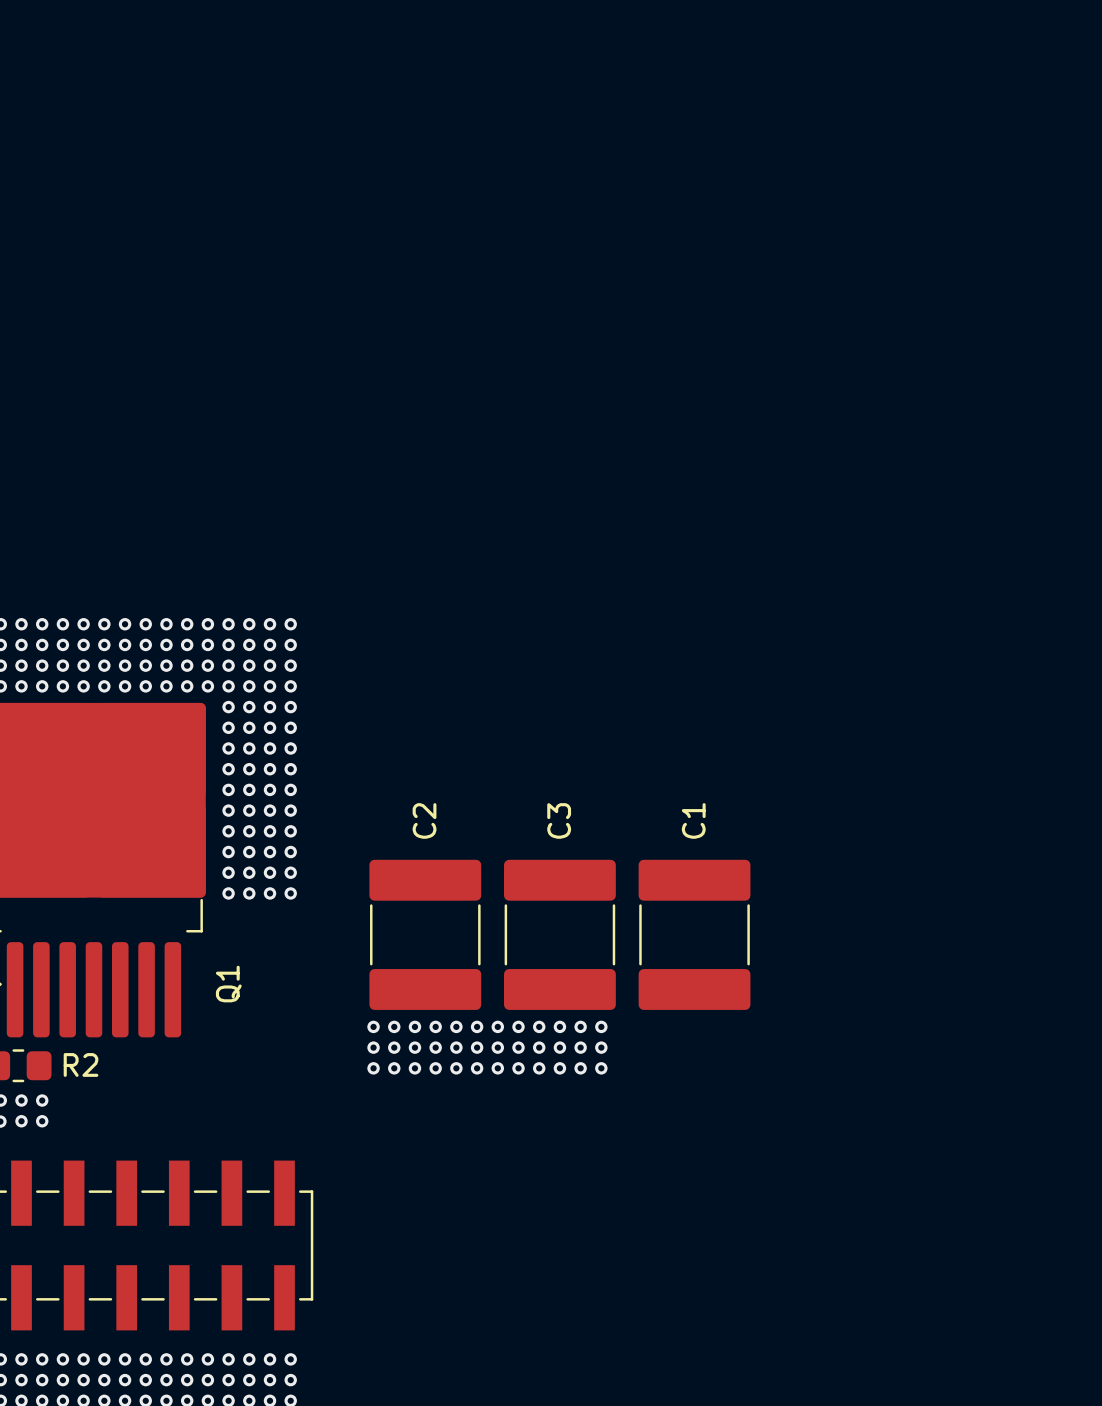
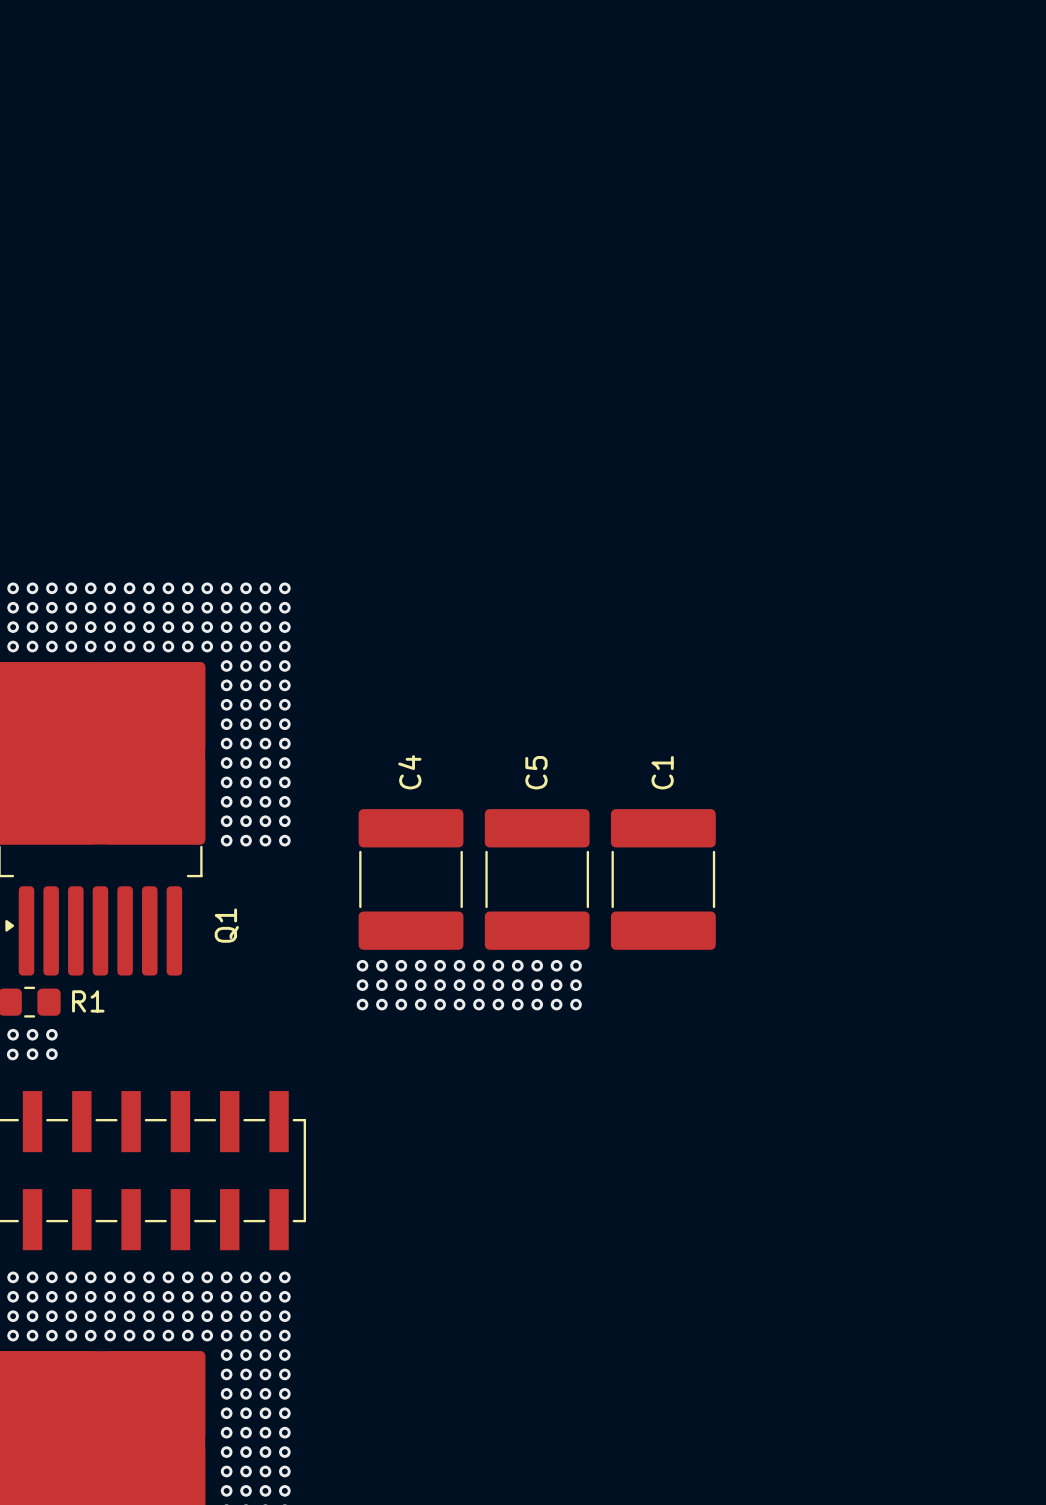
C2 name: C2 (424, 820) -> C4 (409, 772)
C3 name: C3 (559, 820) -> C5 (536, 772)
R2 name: R2 (81, 1064) -> R1 (88, 1001)

